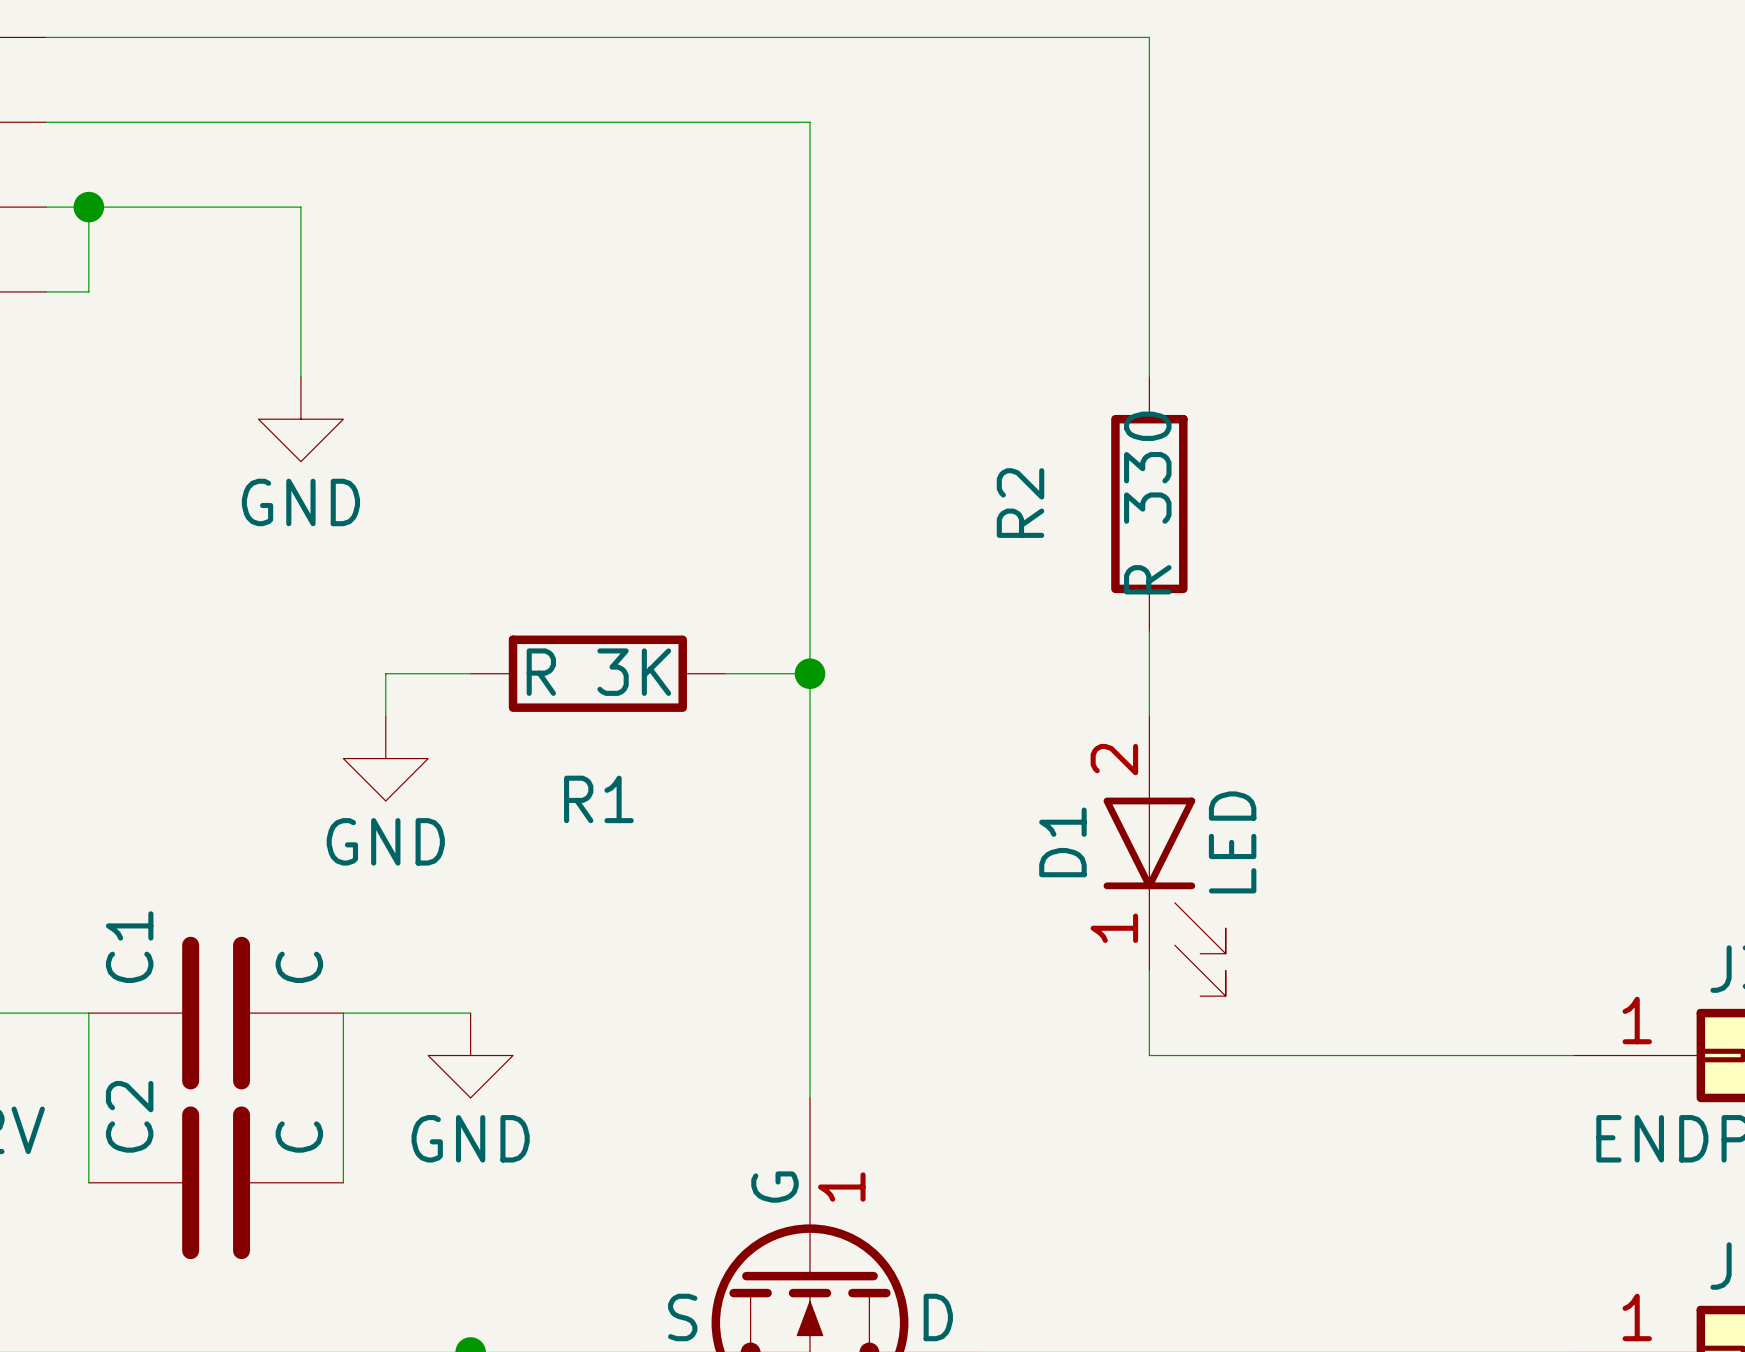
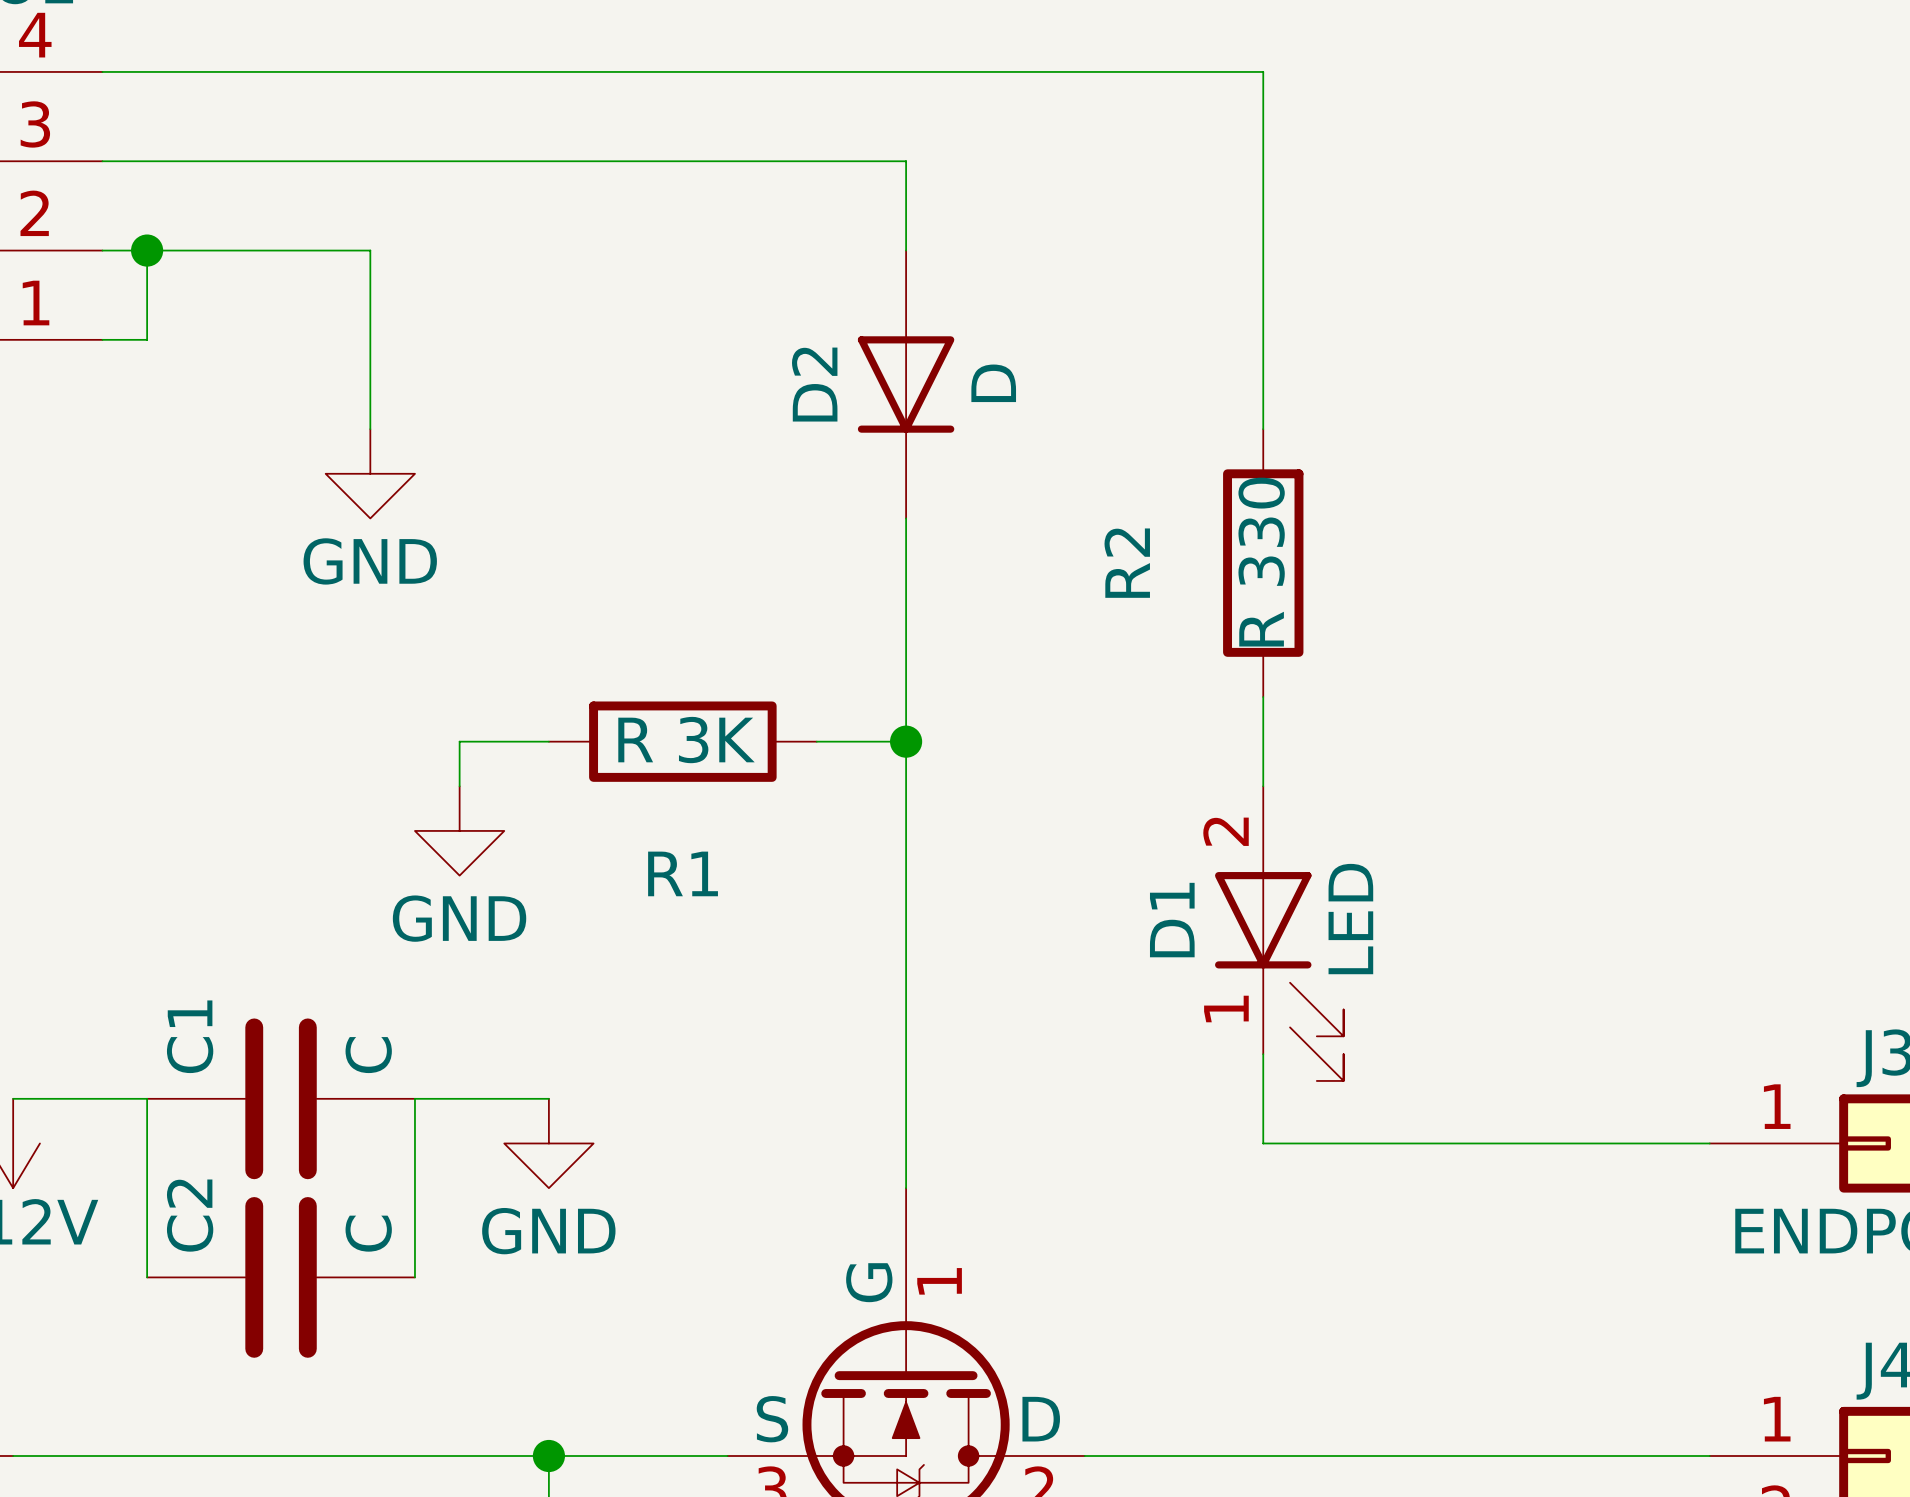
D2: none -> D (906, 384)

